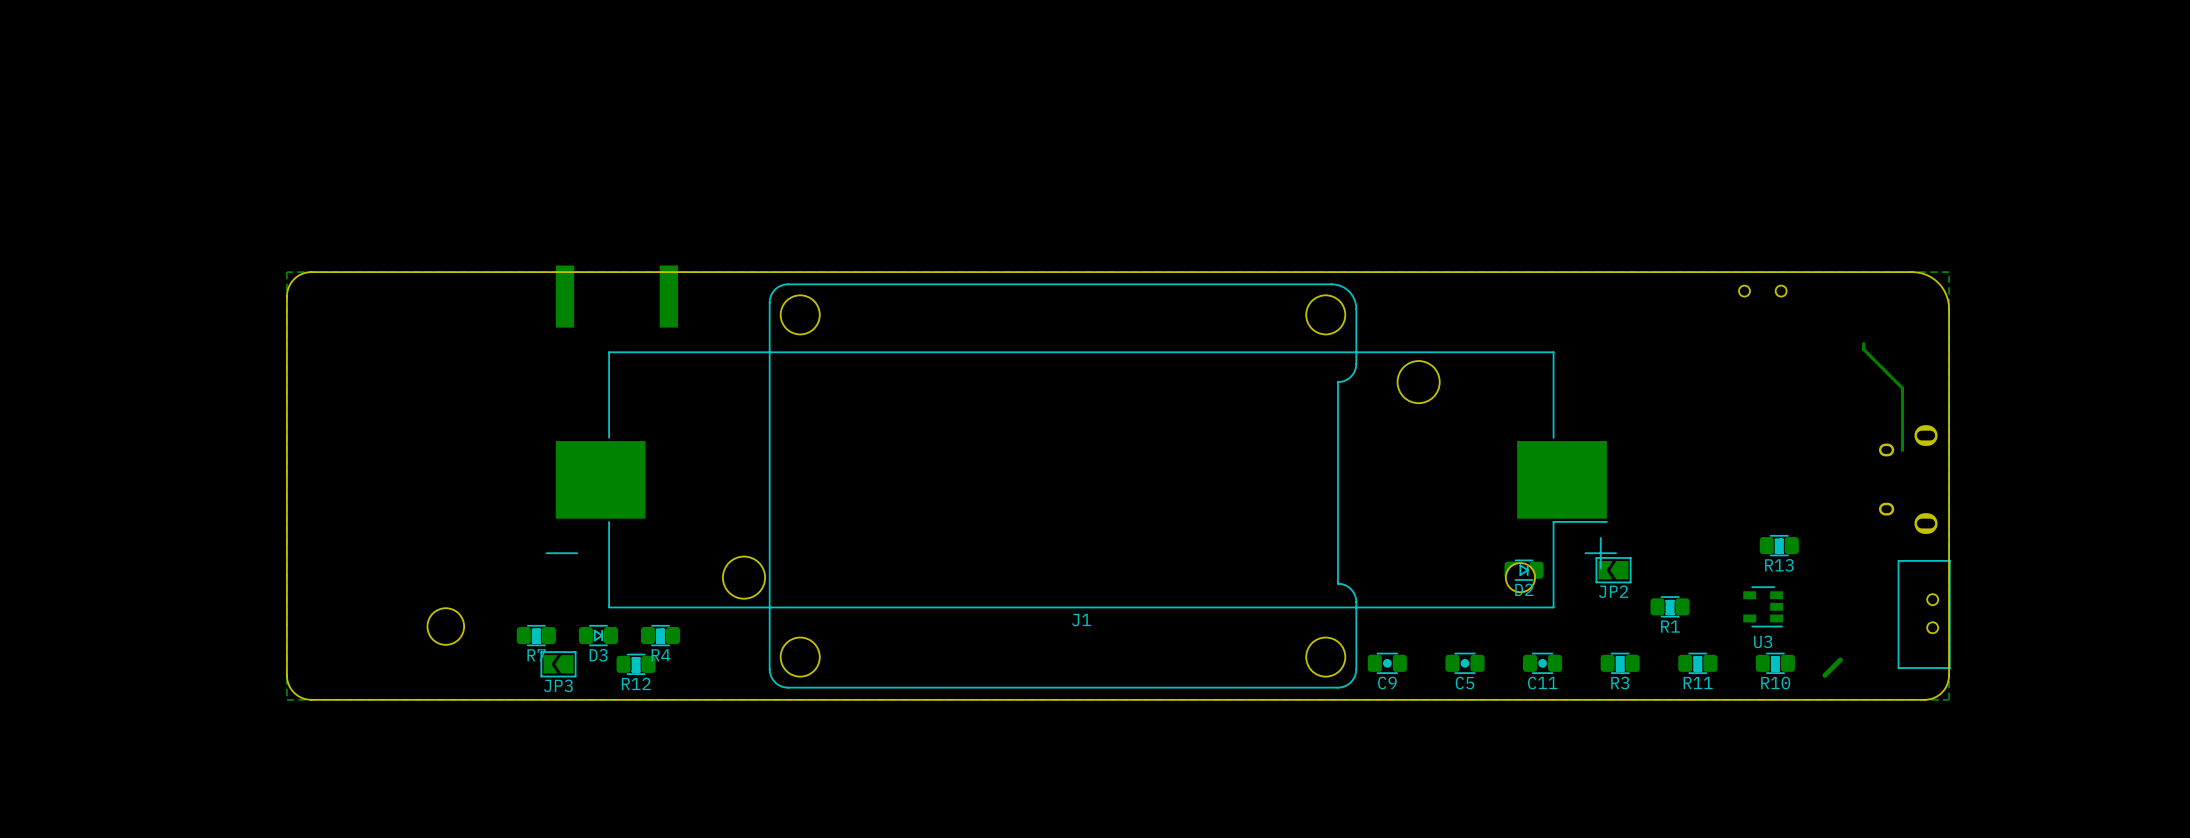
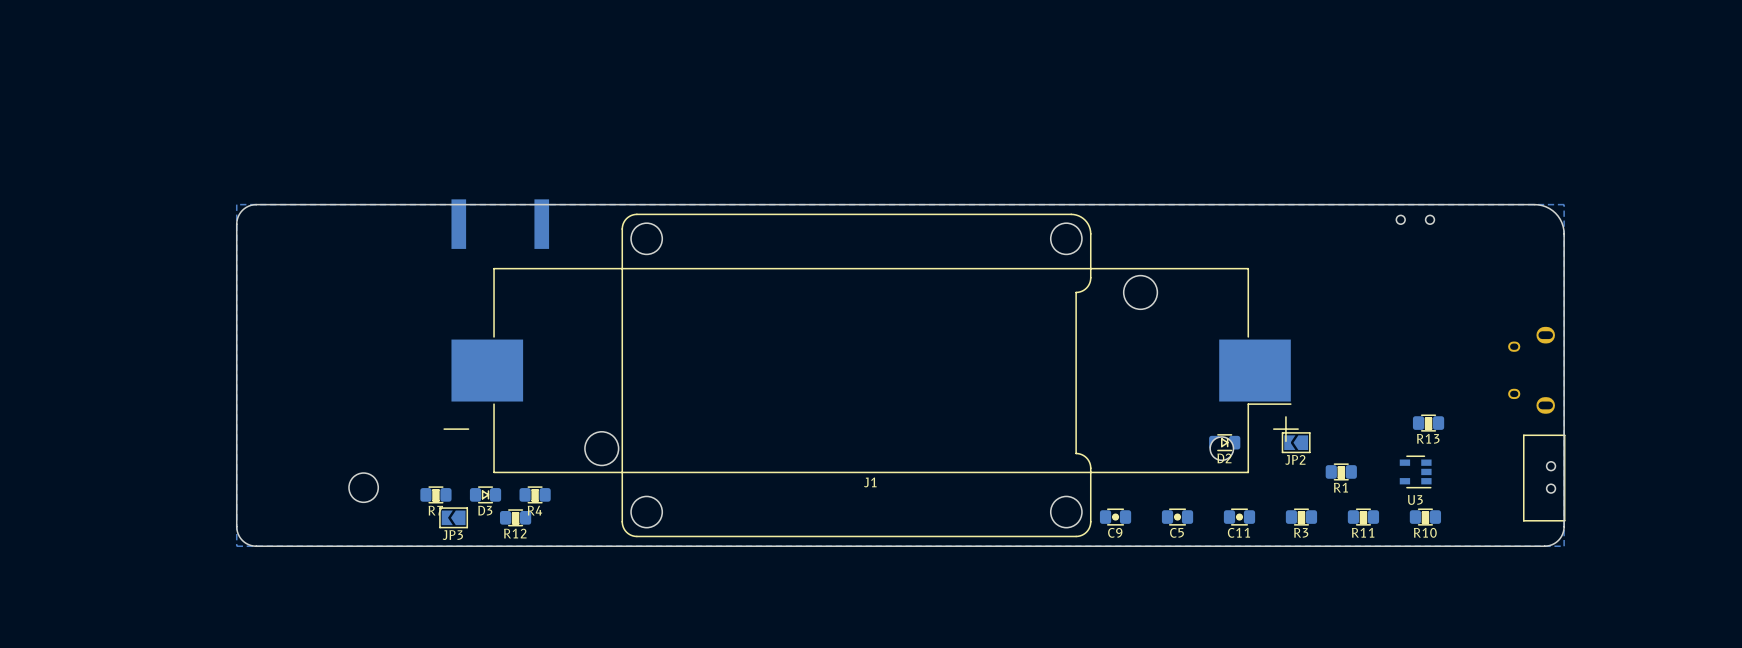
track: (1863, 343) (1863, 349) (1902, 388) (1902, 450) -> none
track: (1840, 659) (1824, 675) -> none

